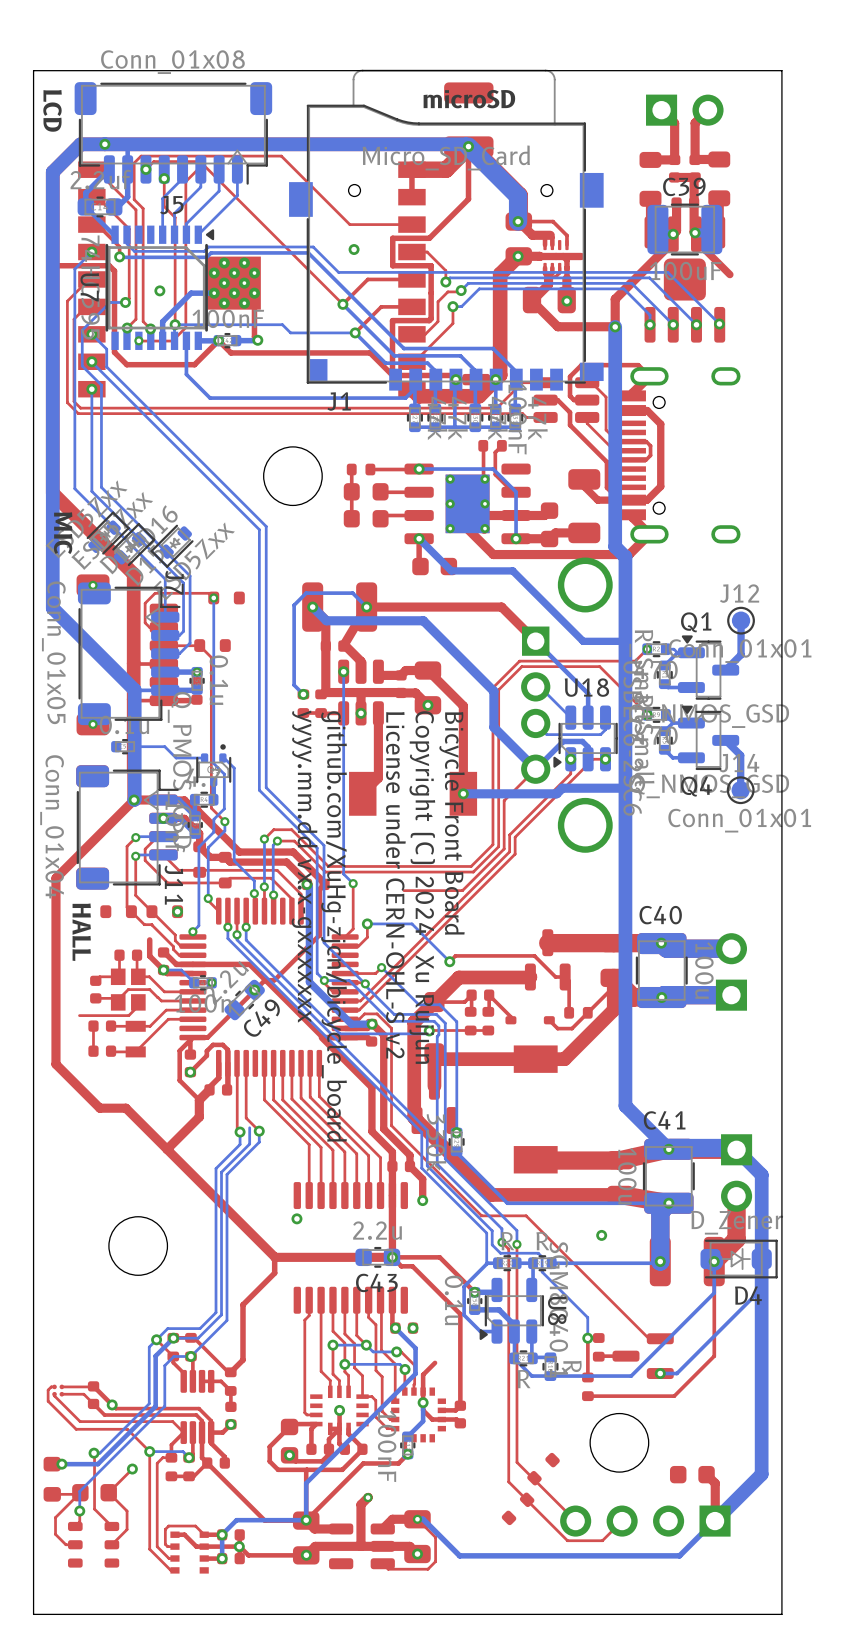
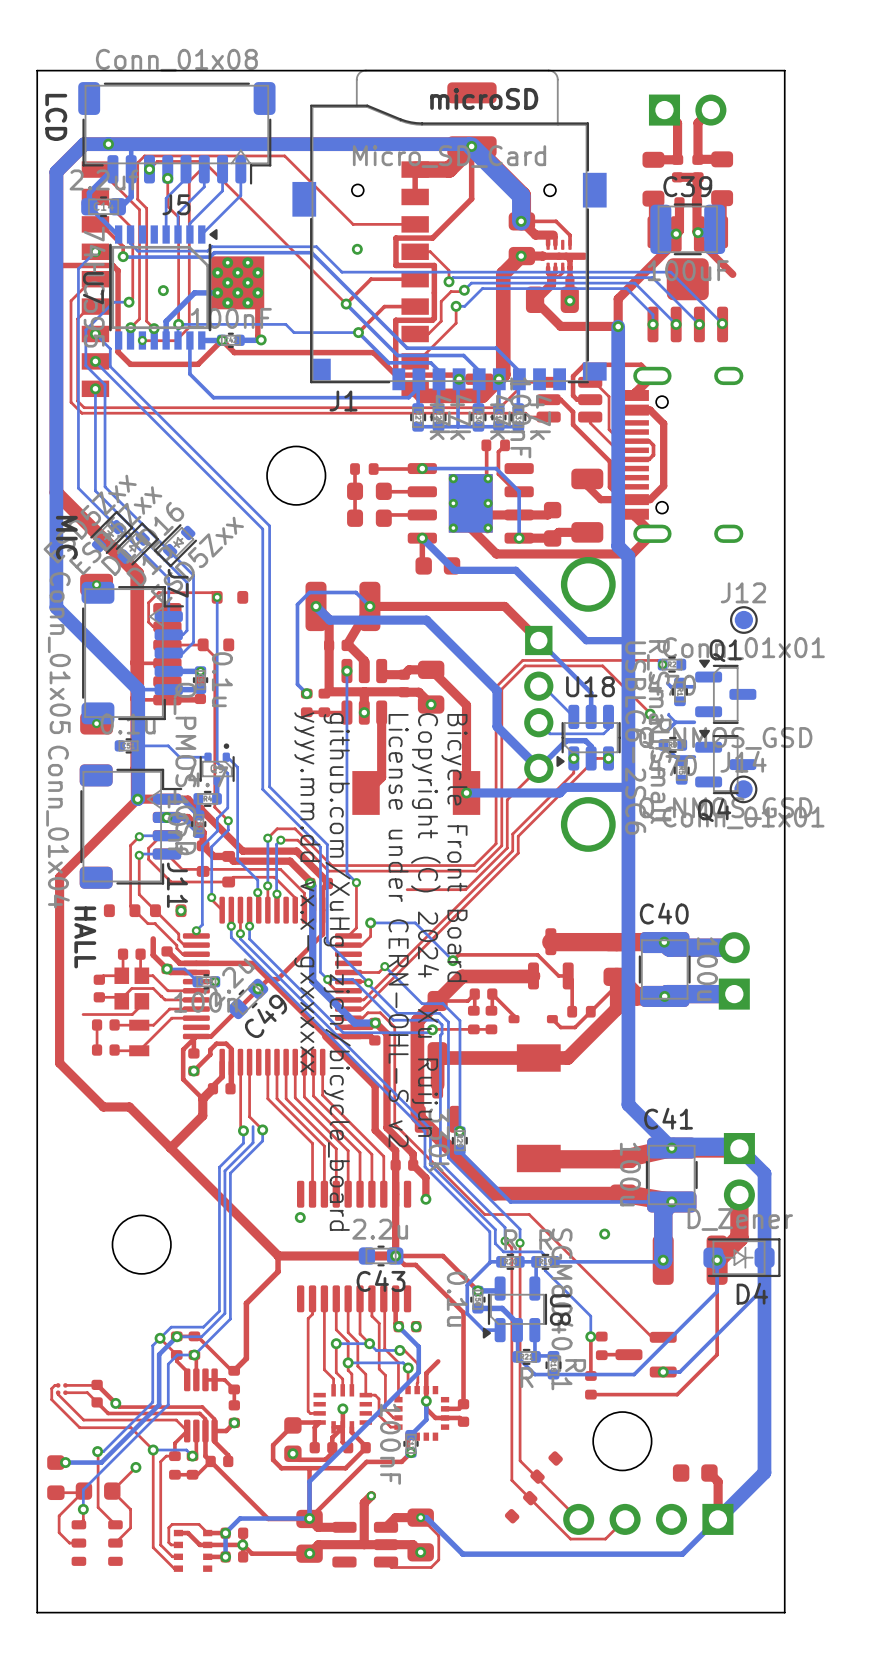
bottom track: (741, 620) (741, 654) (725, 670) -> none
Q1 name position: Q1 (696, 622) -> Q1 (725, 650)
top track: (647, 649) (635, 661) -> (662, 664) (658, 660) (638, 660)
via position: (647, 649) -> (662, 664)
part position: (656, 649) -> (671, 664)
bottom track: (665, 649) (673, 649) (677, 652) -> none
bottom track: (677, 652) (664, 665) -> none
Q1 position: (708, 667) -> (725, 691)
part position: (664, 674) -> (679, 691)
part position: (656, 714) -> (672, 744)
Q4 position: (708, 737) -> (725, 762)
part position: (664, 740) -> (681, 770)
bottom track: (725, 740) (740, 755) (740, 790) -> none

